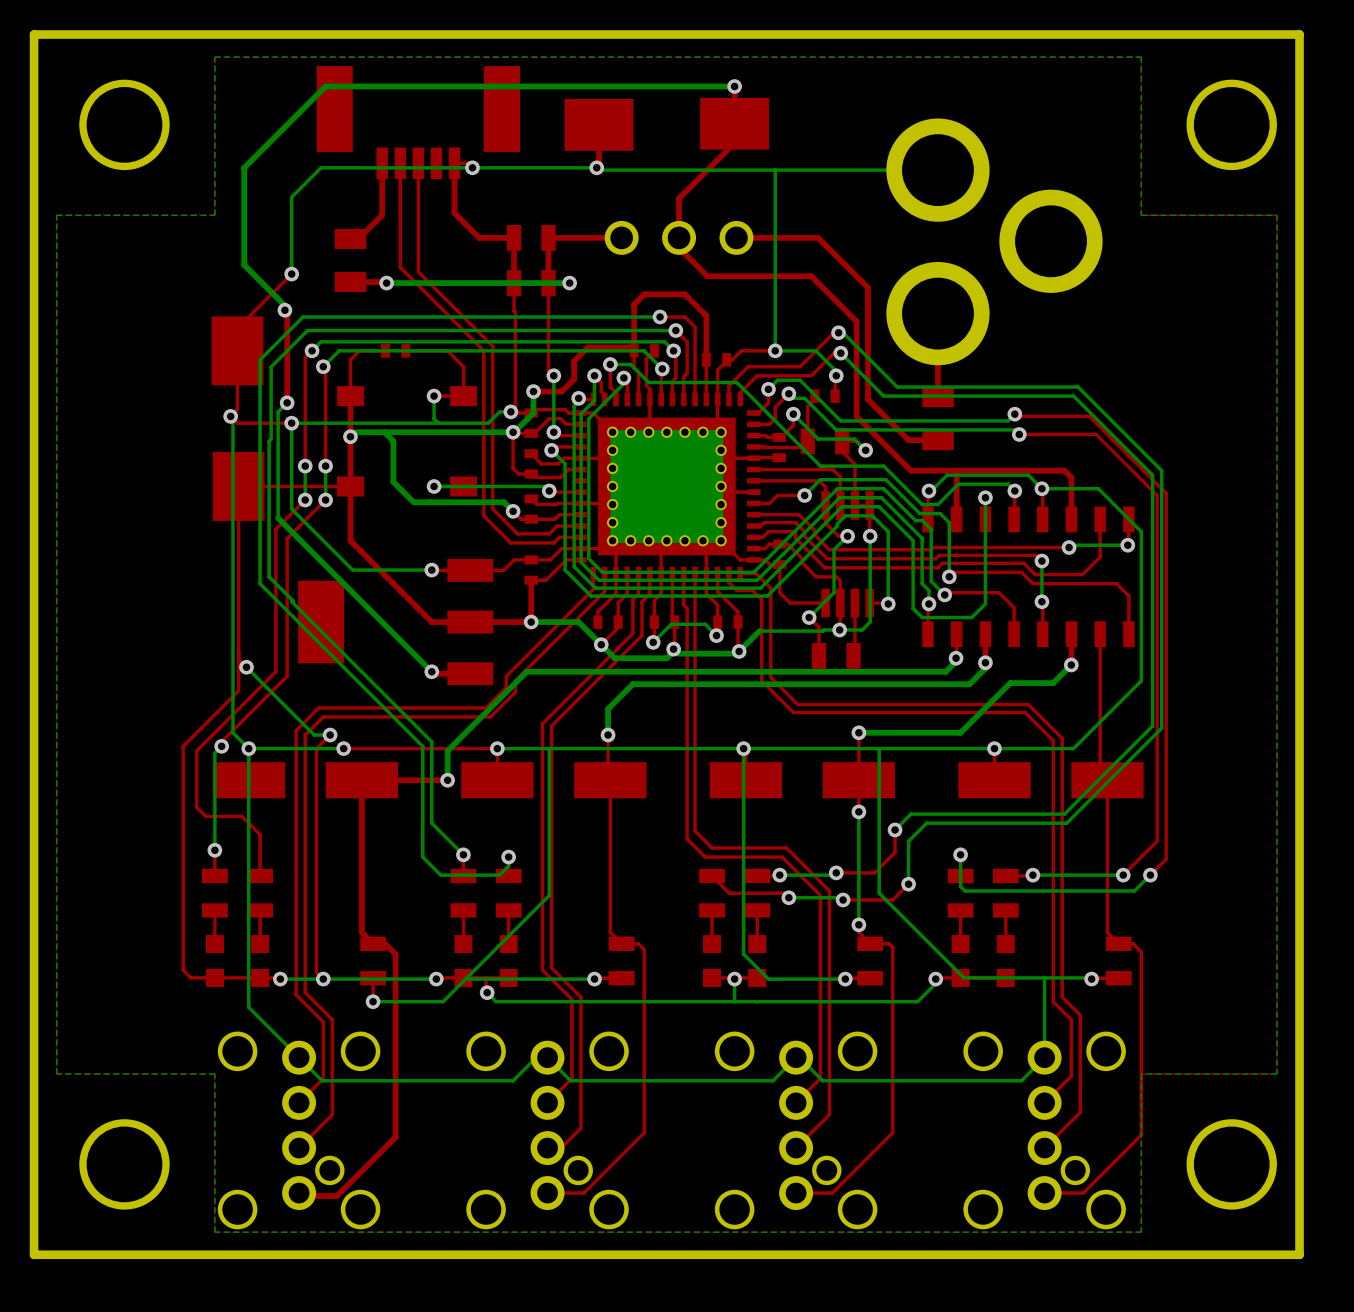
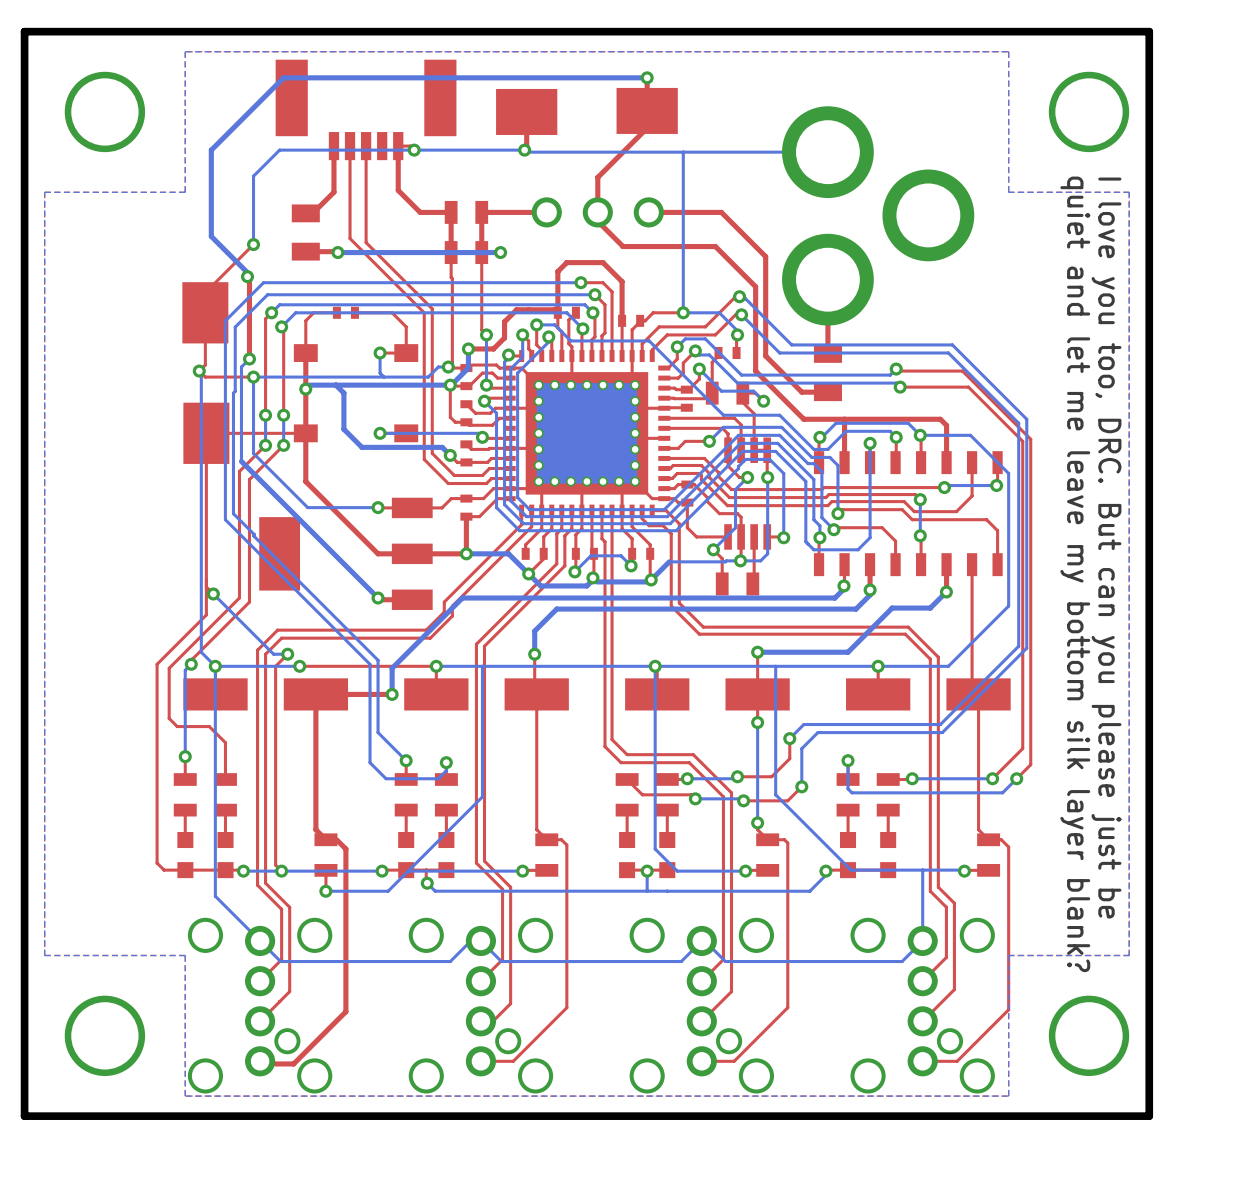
text: none -> I love you too, DRC. But can you please just be (1106, 548)
text: none -> quiet and let me leave my bottom silk layer blank? (1075, 574)

